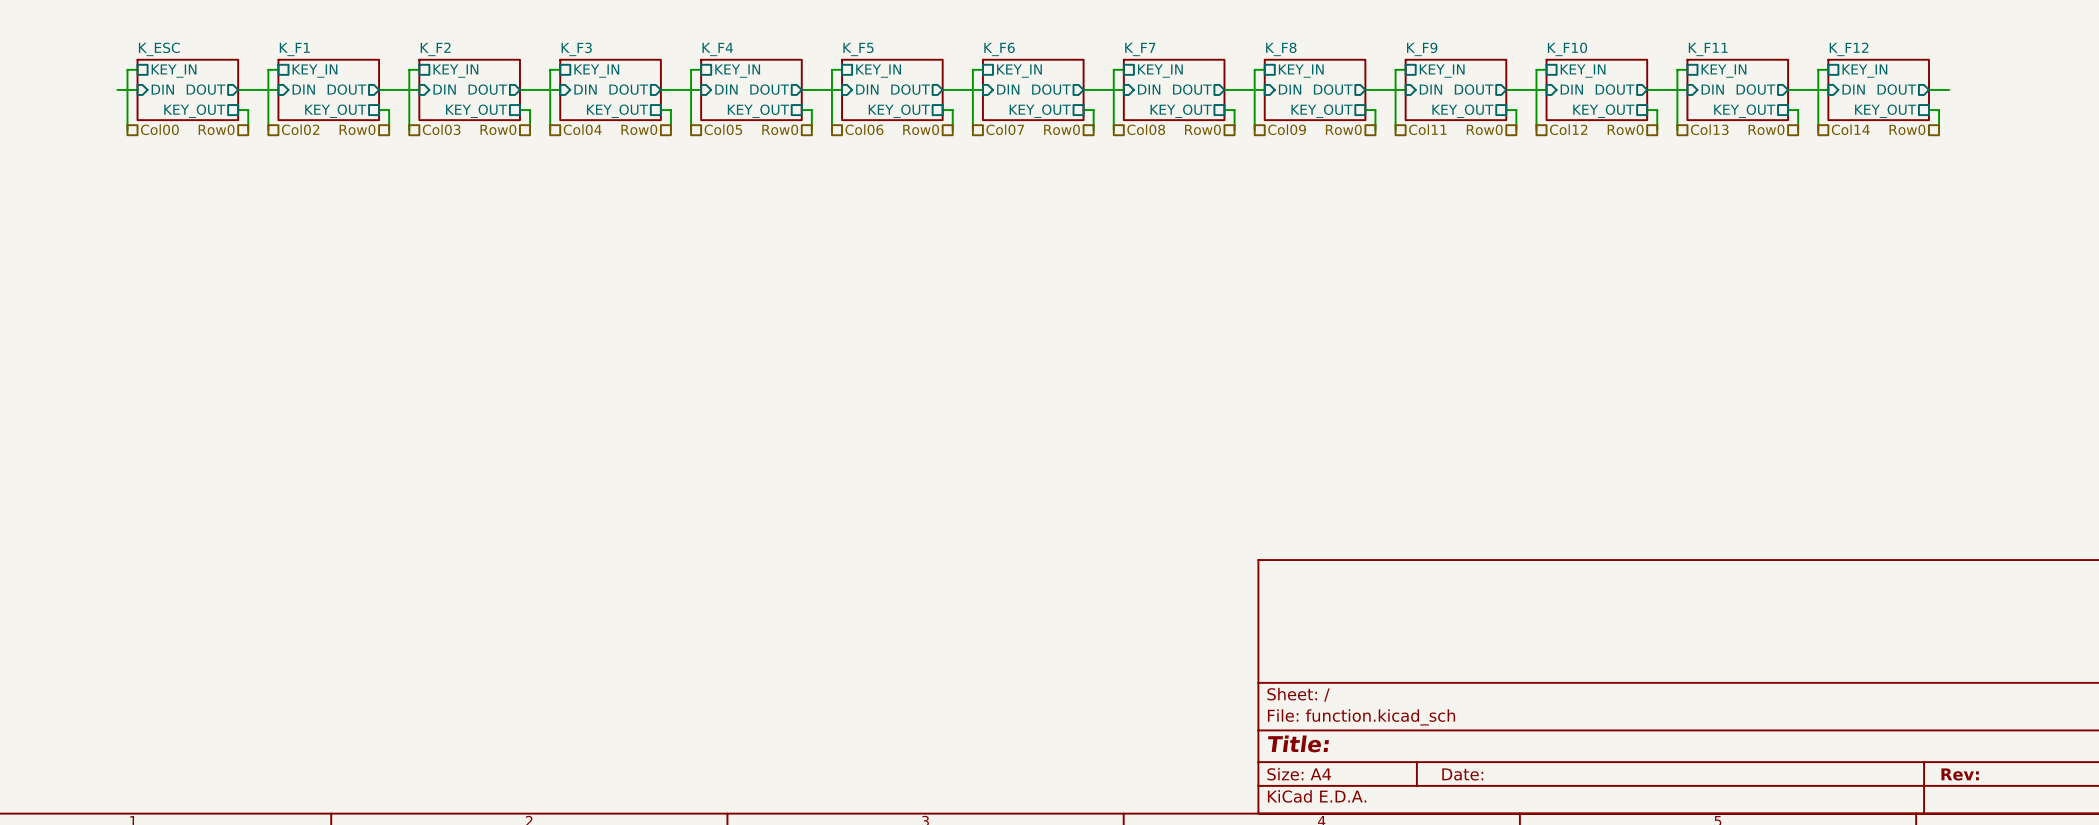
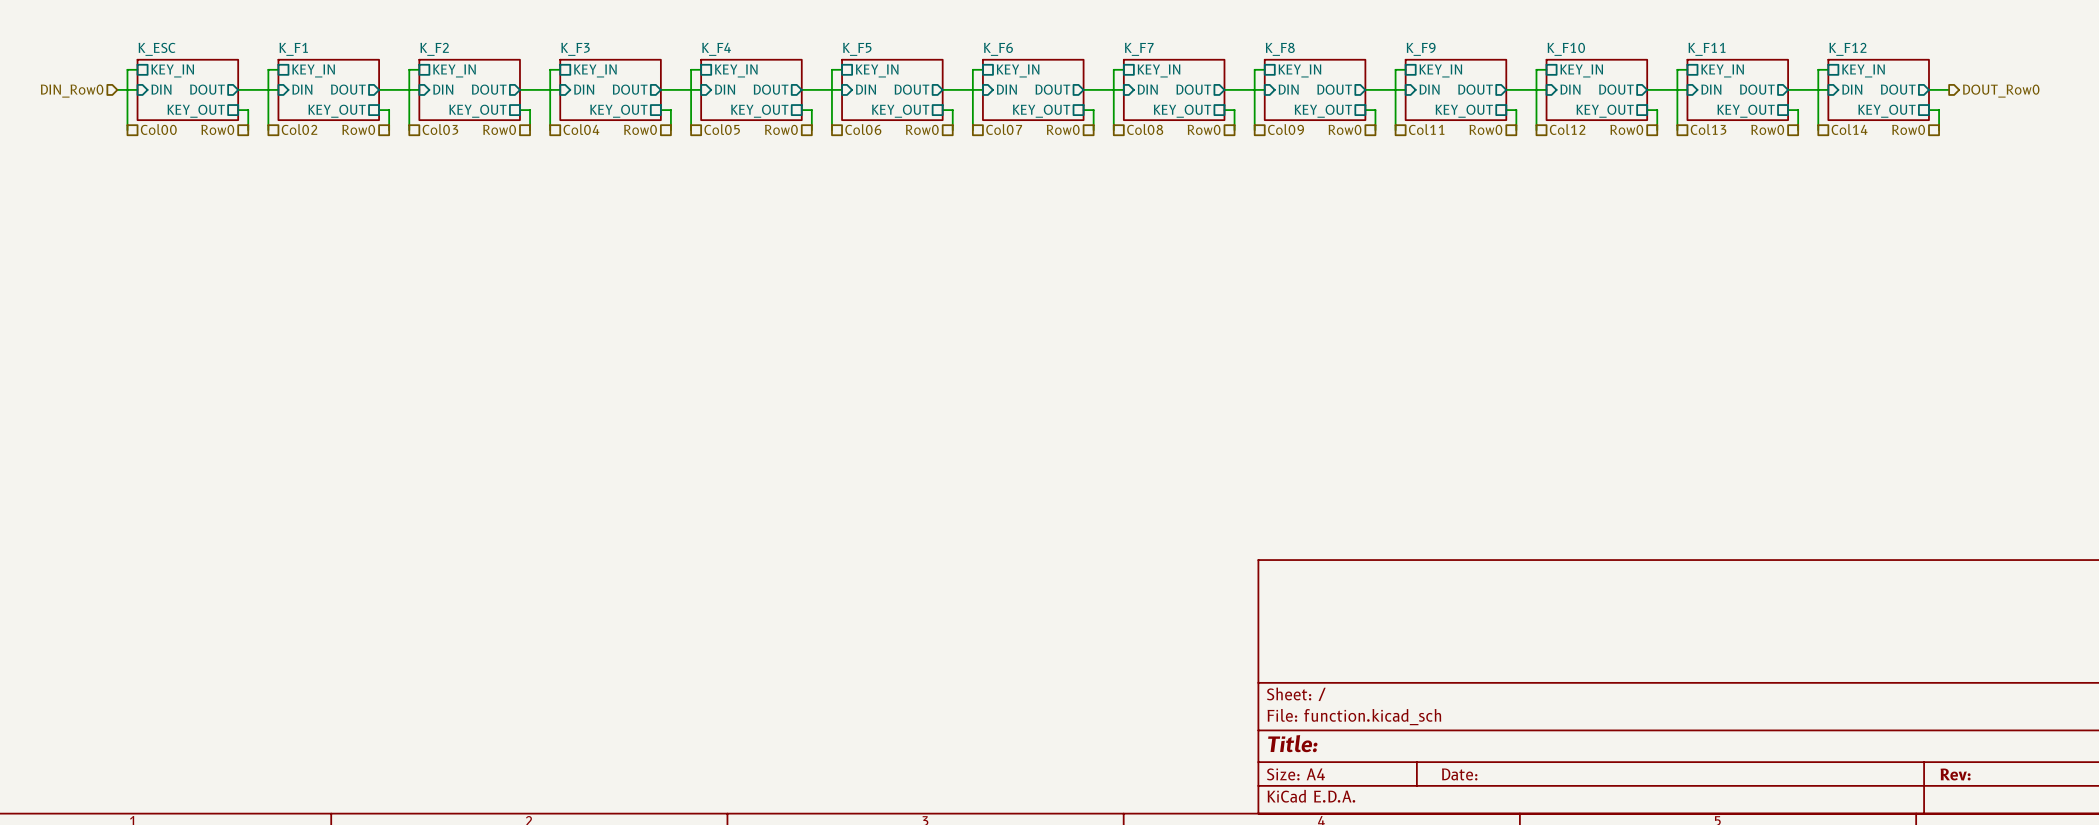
hierarchical label: none -> DIN_Row0 (72, 91)
hierarchical label: none -> DOUT_Row0 (2001, 91)

